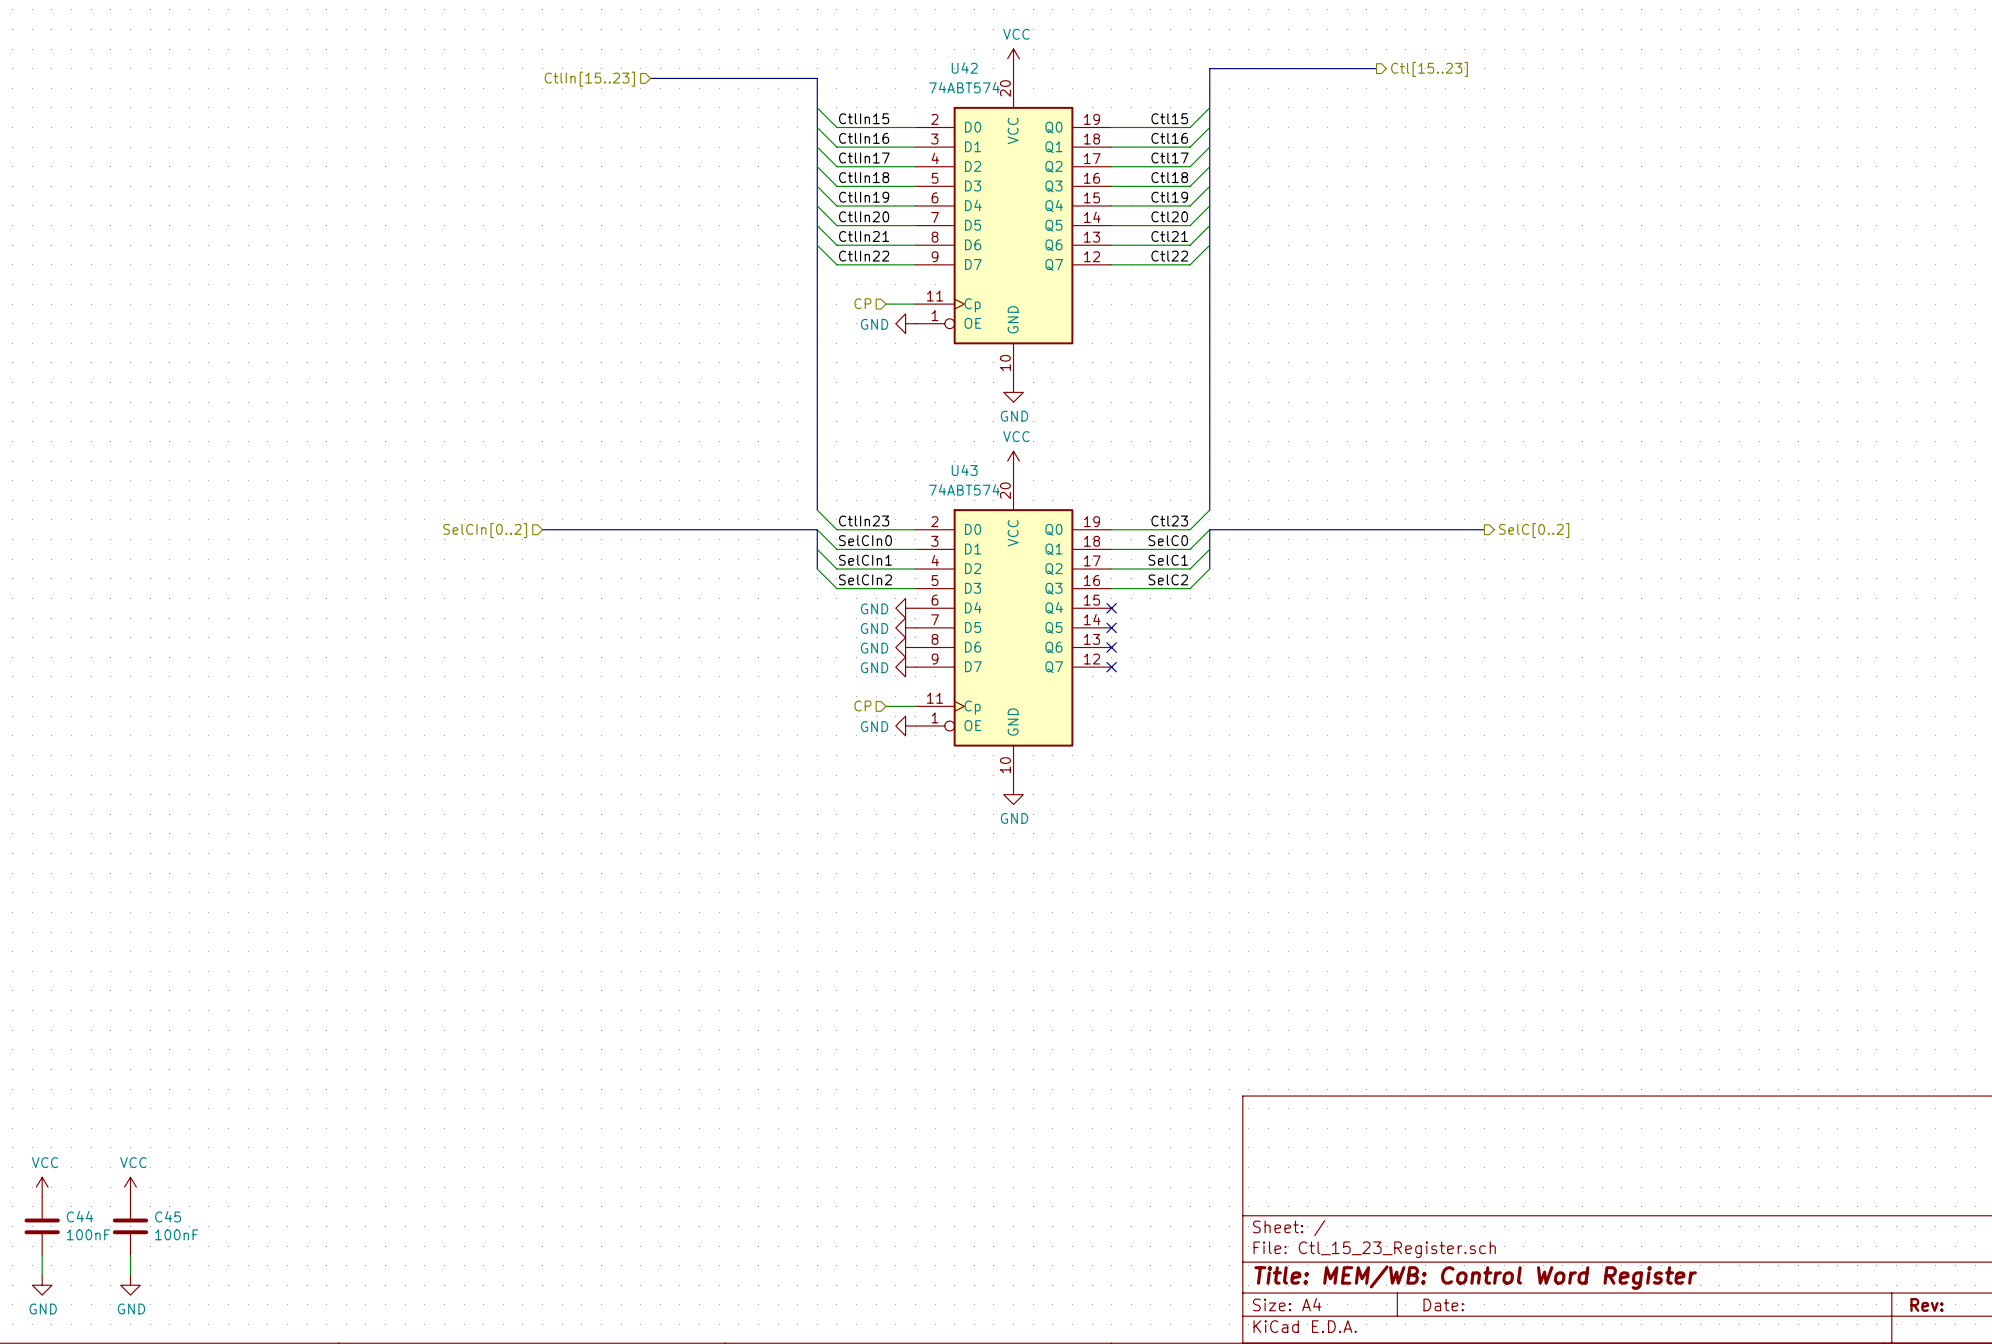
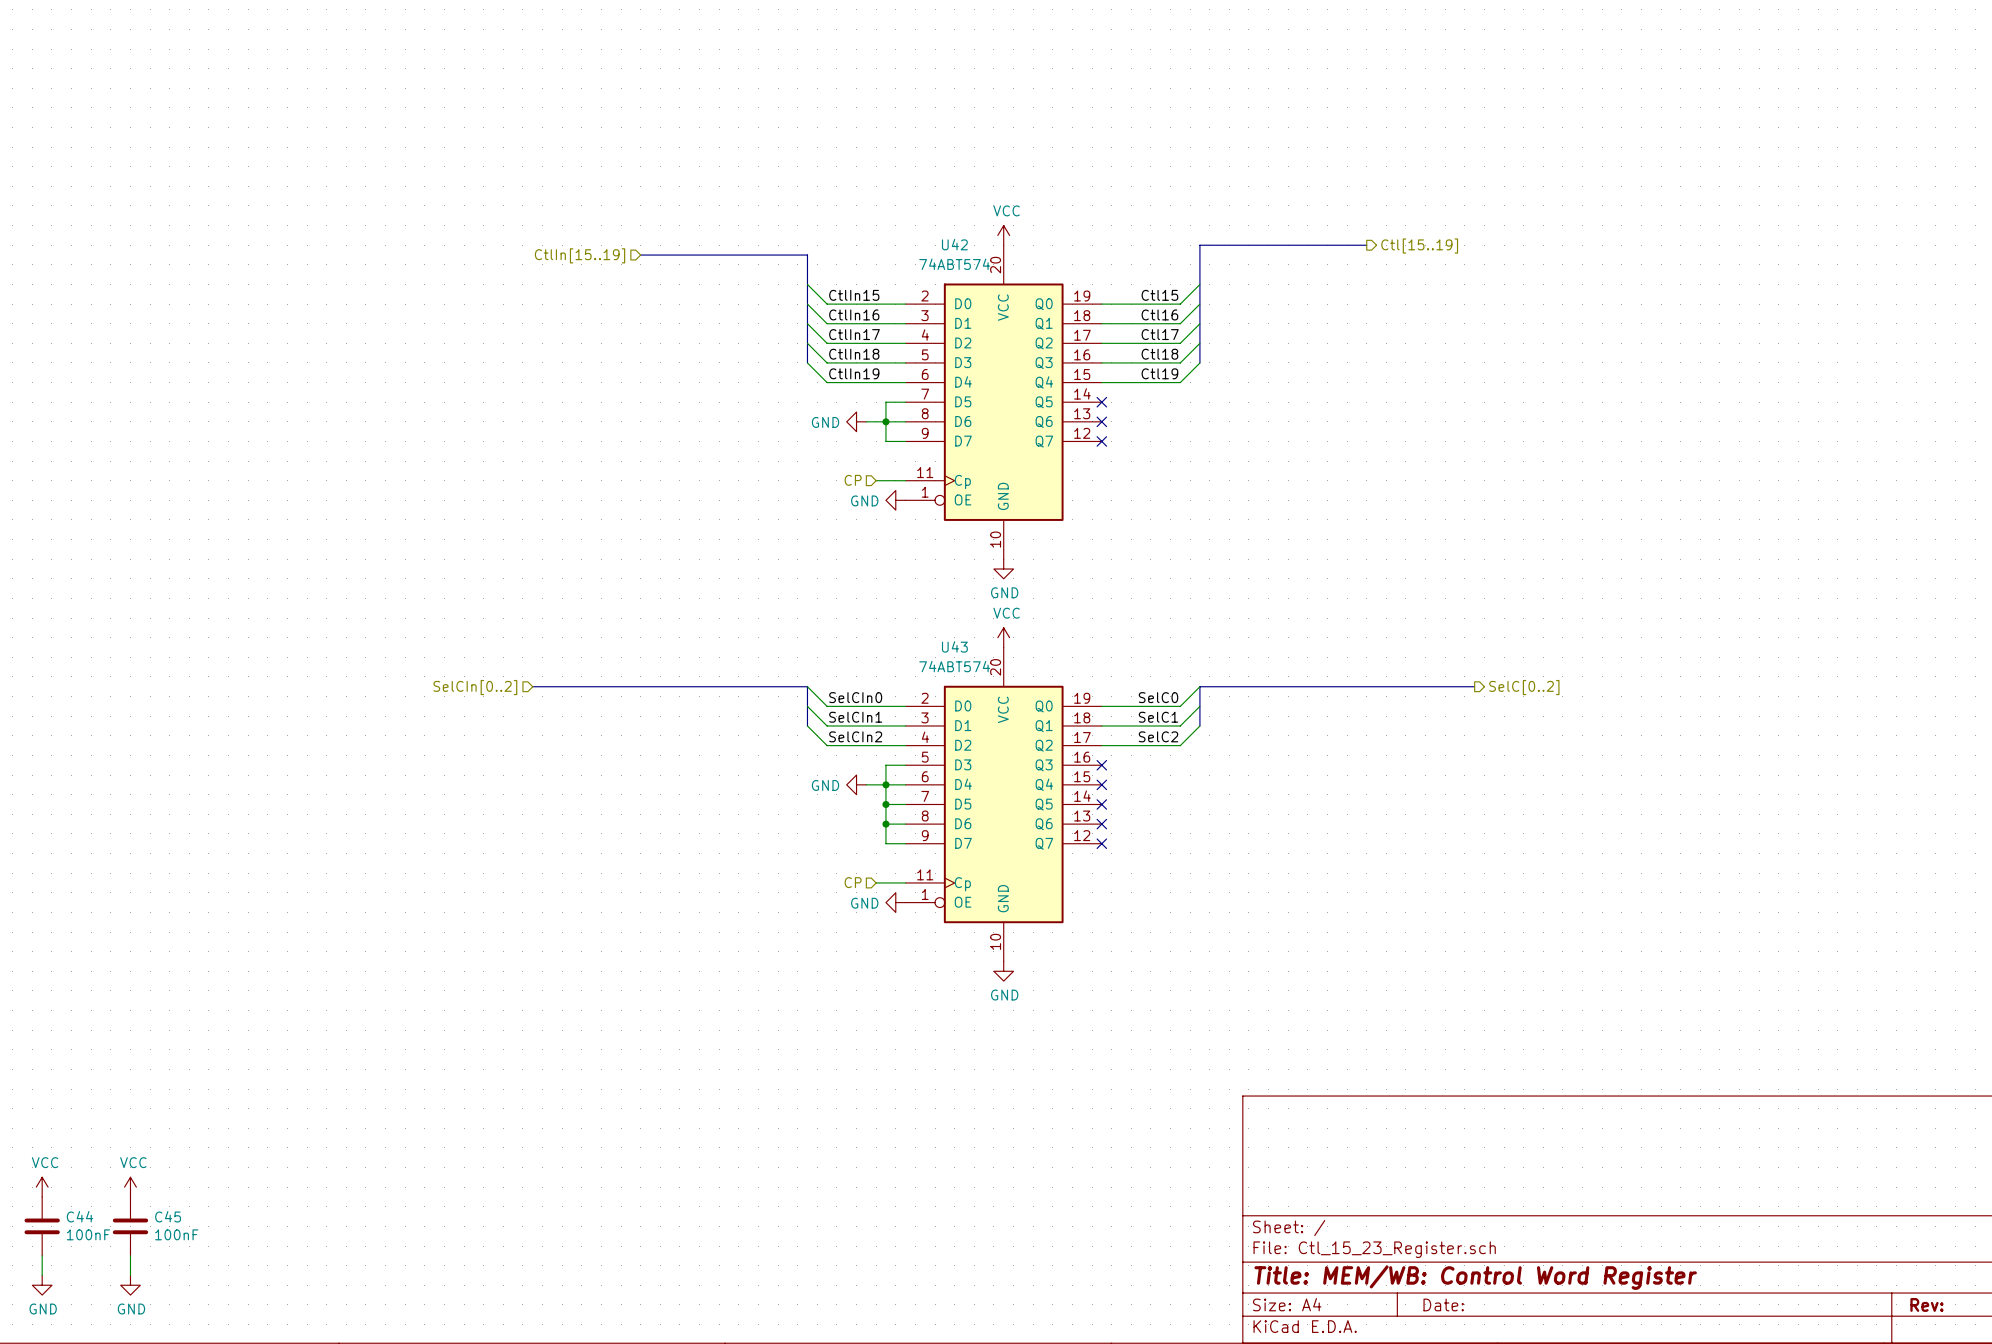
power symbol: VCC (1013, 58) -> none
bus: (1376, 68) (1209, 68) (1209, 510) -> none
hierarchical label: Ctl[15..23] (1429, 69) -> none
bus: (650, 78) (817, 78) (817, 510) -> none
hierarchical label: CtlIn[15..23] (589, 79) -> none
wire: (817, 107) (836, 127) (915, 127) -> none
wire: (1209, 107) (1190, 127) (1111, 127) -> none
label position: CtlIn15 (864, 118) -> CtlIn15 (854, 295)
label position: Ctl15 (1169, 118) -> Ctl15 (1159, 295)
wire: (817, 127) (836, 147) (915, 147) -> none
wire: (1209, 127) (1190, 147) (1111, 147) -> (1199, 284) (1180, 304) (1101, 304)
label position: CtlIn16 (864, 138) -> CtlIn16 (854, 314)
label position: Ctl16 (1169, 138) -> Ctl16 (1159, 314)
wire: (817, 147) (836, 166) (915, 166) -> (807, 304) (827, 323) (905, 323)
wire: (1209, 147) (1190, 166) (1111, 166) -> (1199, 304) (1180, 323) (1101, 323)
label position: CtlIn17 (864, 157) -> CtlIn17 (854, 334)
label position: Ctl17 (1169, 157) -> Ctl17 (1160, 334)
wire: (817, 166) (836, 186) (915, 186) -> (807, 323) (827, 343) (905, 343)
wire: (1209, 166) (1190, 186) (1111, 186) -> (1199, 323) (1180, 343) (1101, 343)
label position: CtlIn18 (864, 177) -> CtlIn18 (854, 354)
label position: Ctl18 (1169, 177) -> Ctl18 (1159, 354)
wire: (817, 186) (836, 205) (915, 205) -> (807, 343) (827, 362) (905, 362)
wire: (1209, 186) (1190, 205) (1111, 205) -> (1199, 343) (1180, 362) (1101, 362)
label position: CtlIn19 (864, 197) -> CtlIn19 (854, 373)
label position: Ctl19 (1169, 197) -> Ctl19 (1159, 373)
wire: (817, 205) (836, 225) (915, 225) -> (807, 362) (827, 382) (905, 382)
wire: (1209, 205) (1190, 225) (1111, 225) -> (1199, 362) (1180, 382) (1101, 382)
label: CtlIn20 (864, 216) -> none
label: Ctl20 (1169, 216) -> none
wire: (817, 225) (836, 245) (915, 245) -> none
U42 position: (1013, 225) -> (1003, 402)
wire: (1209, 225) (1190, 245) (1111, 245) -> none
power symbol: none -> VCC (1003, 235)
label: CtlIn21 (864, 236) -> none
label: Ctl21 (1169, 236) -> none
wire: (817, 245) (836, 264) (915, 264) -> none
wire: (1209, 245) (1190, 264) (1111, 264) -> none
bus: none -> (1366, 245) (1199, 245) (1199, 362)
hierarchical label: none -> Ctl[15..19] (1419, 246)
hierarchical label: none -> CtlIn[15..19] (580, 255)
bus: none -> (640, 255) (807, 255) (807, 362)
label: CtlIn22 (864, 256) -> none
label: Ctl22 (1169, 256) -> none
wire: none -> (807, 284) (827, 304) (885, 304)
hierarchical label: CP (862, 303) -> none
power symbol: GND (905, 323) -> none
power symbol: GND (1013, 392) -> none
wire: none -> (905, 402) (885, 402) (885, 441) (905, 441)
no-connect mark: none -> (1101, 402)
power symbol: none -> GND (856, 421)
wire: none -> (866, 421) (905, 421)
junction: none -> (885, 421)
no-connect mark: none -> (1101, 421)
no-connect mark: none -> (1101, 441)
power symbol: VCC (1013, 461) -> none
hierarchical label: none -> CP (853, 480)
wire: none -> (876, 480) (905, 480)
power symbol: none -> GND (895, 500)
wire: (817, 510) (836, 529) (915, 529) -> none
wire: (1209, 510) (1190, 529) (1111, 529) -> none
label: CtlIn23 (864, 521) -> none
label: Ctl23 (1169, 521) -> none
bus: (542, 529) (817, 529) (817, 569) -> (532, 686) (807, 686) (807, 725)
wire: (817, 529) (836, 549) (915, 549) -> none
wire: (1209, 529) (1190, 549) (1111, 549) -> (1199, 686) (1180, 706) (1101, 706)
bus: (1484, 529) (1209, 529) (1209, 569) -> (1474, 686) (1199, 686) (1199, 725)
hierarchical label position: SelCIn[0..2] (485, 530) -> SelCIn[0..2] (475, 687)
hierarchical label position: SelC[0..2] (1534, 530) -> SelC[0..2] (1524, 687)
label position: SelCIn0 (865, 540) -> SelCIn0 (855, 697)
label position: SelC0 (1168, 540) -> SelC0 (1158, 697)
wire: (817, 549) (836, 569) (915, 569) -> (807, 706) (827, 725) (905, 725)
wire: (1209, 549) (1190, 569) (1111, 569) -> (1199, 706) (1180, 725) (1101, 725)
label position: SelCIn1 (865, 560) -> SelCIn1 (855, 717)
label position: SelC1 (1168, 560) -> SelC1 (1158, 717)
wire: (817, 569) (836, 588) (915, 588) -> (807, 725) (827, 745) (905, 745)
power symbol: none -> GND (1003, 569)
wire: (1209, 569) (1190, 588) (1111, 588) -> (1199, 725) (1180, 745) (1101, 745)
label position: SelCIn2 (865, 579) -> SelCIn2 (855, 736)
label position: SelC2 (1168, 579) -> SelC2 (1158, 736)
power symbol: GND (905, 608) -> none
no-connect mark: (1111, 608) -> none
power symbol: GND (905, 627) -> none
U43 position: (1013, 627) -> (1003, 804)
no-connect mark: (1111, 627) -> none
power symbol: none -> VCC (1003, 637)
power symbol: GND (905, 647) -> none
no-connect mark: (1111, 647) -> none
power symbol: GND (905, 667) -> none
no-connect mark: (1111, 667) -> none
wire: none -> (807, 686) (827, 706) (885, 706)
hierarchical label: CP (862, 706) -> none
power symbol: GND (905, 725) -> none
wire: none -> (905, 765) (885, 765) (885, 843) (905, 843)
no-connect mark: none -> (1101, 765)
power symbol: none -> GND (856, 784)
wire: none -> (866, 784) (905, 784)
junction: none -> (885, 784)
no-connect mark: none -> (1101, 784)
power symbol: GND (1013, 794) -> none
wire: none -> (885, 804) (905, 804)
junction: none -> (885, 804)
no-connect mark: none -> (1101, 804)
wire: none -> (885, 824) (905, 824)
junction: none -> (885, 824)
no-connect mark: none -> (1101, 824)
no-connect mark: none -> (1101, 843)
hierarchical label: none -> CP (853, 882)
wire: none -> (876, 882) (905, 882)
power symbol: none -> GND (895, 902)
power symbol: none -> GND (1003, 971)

